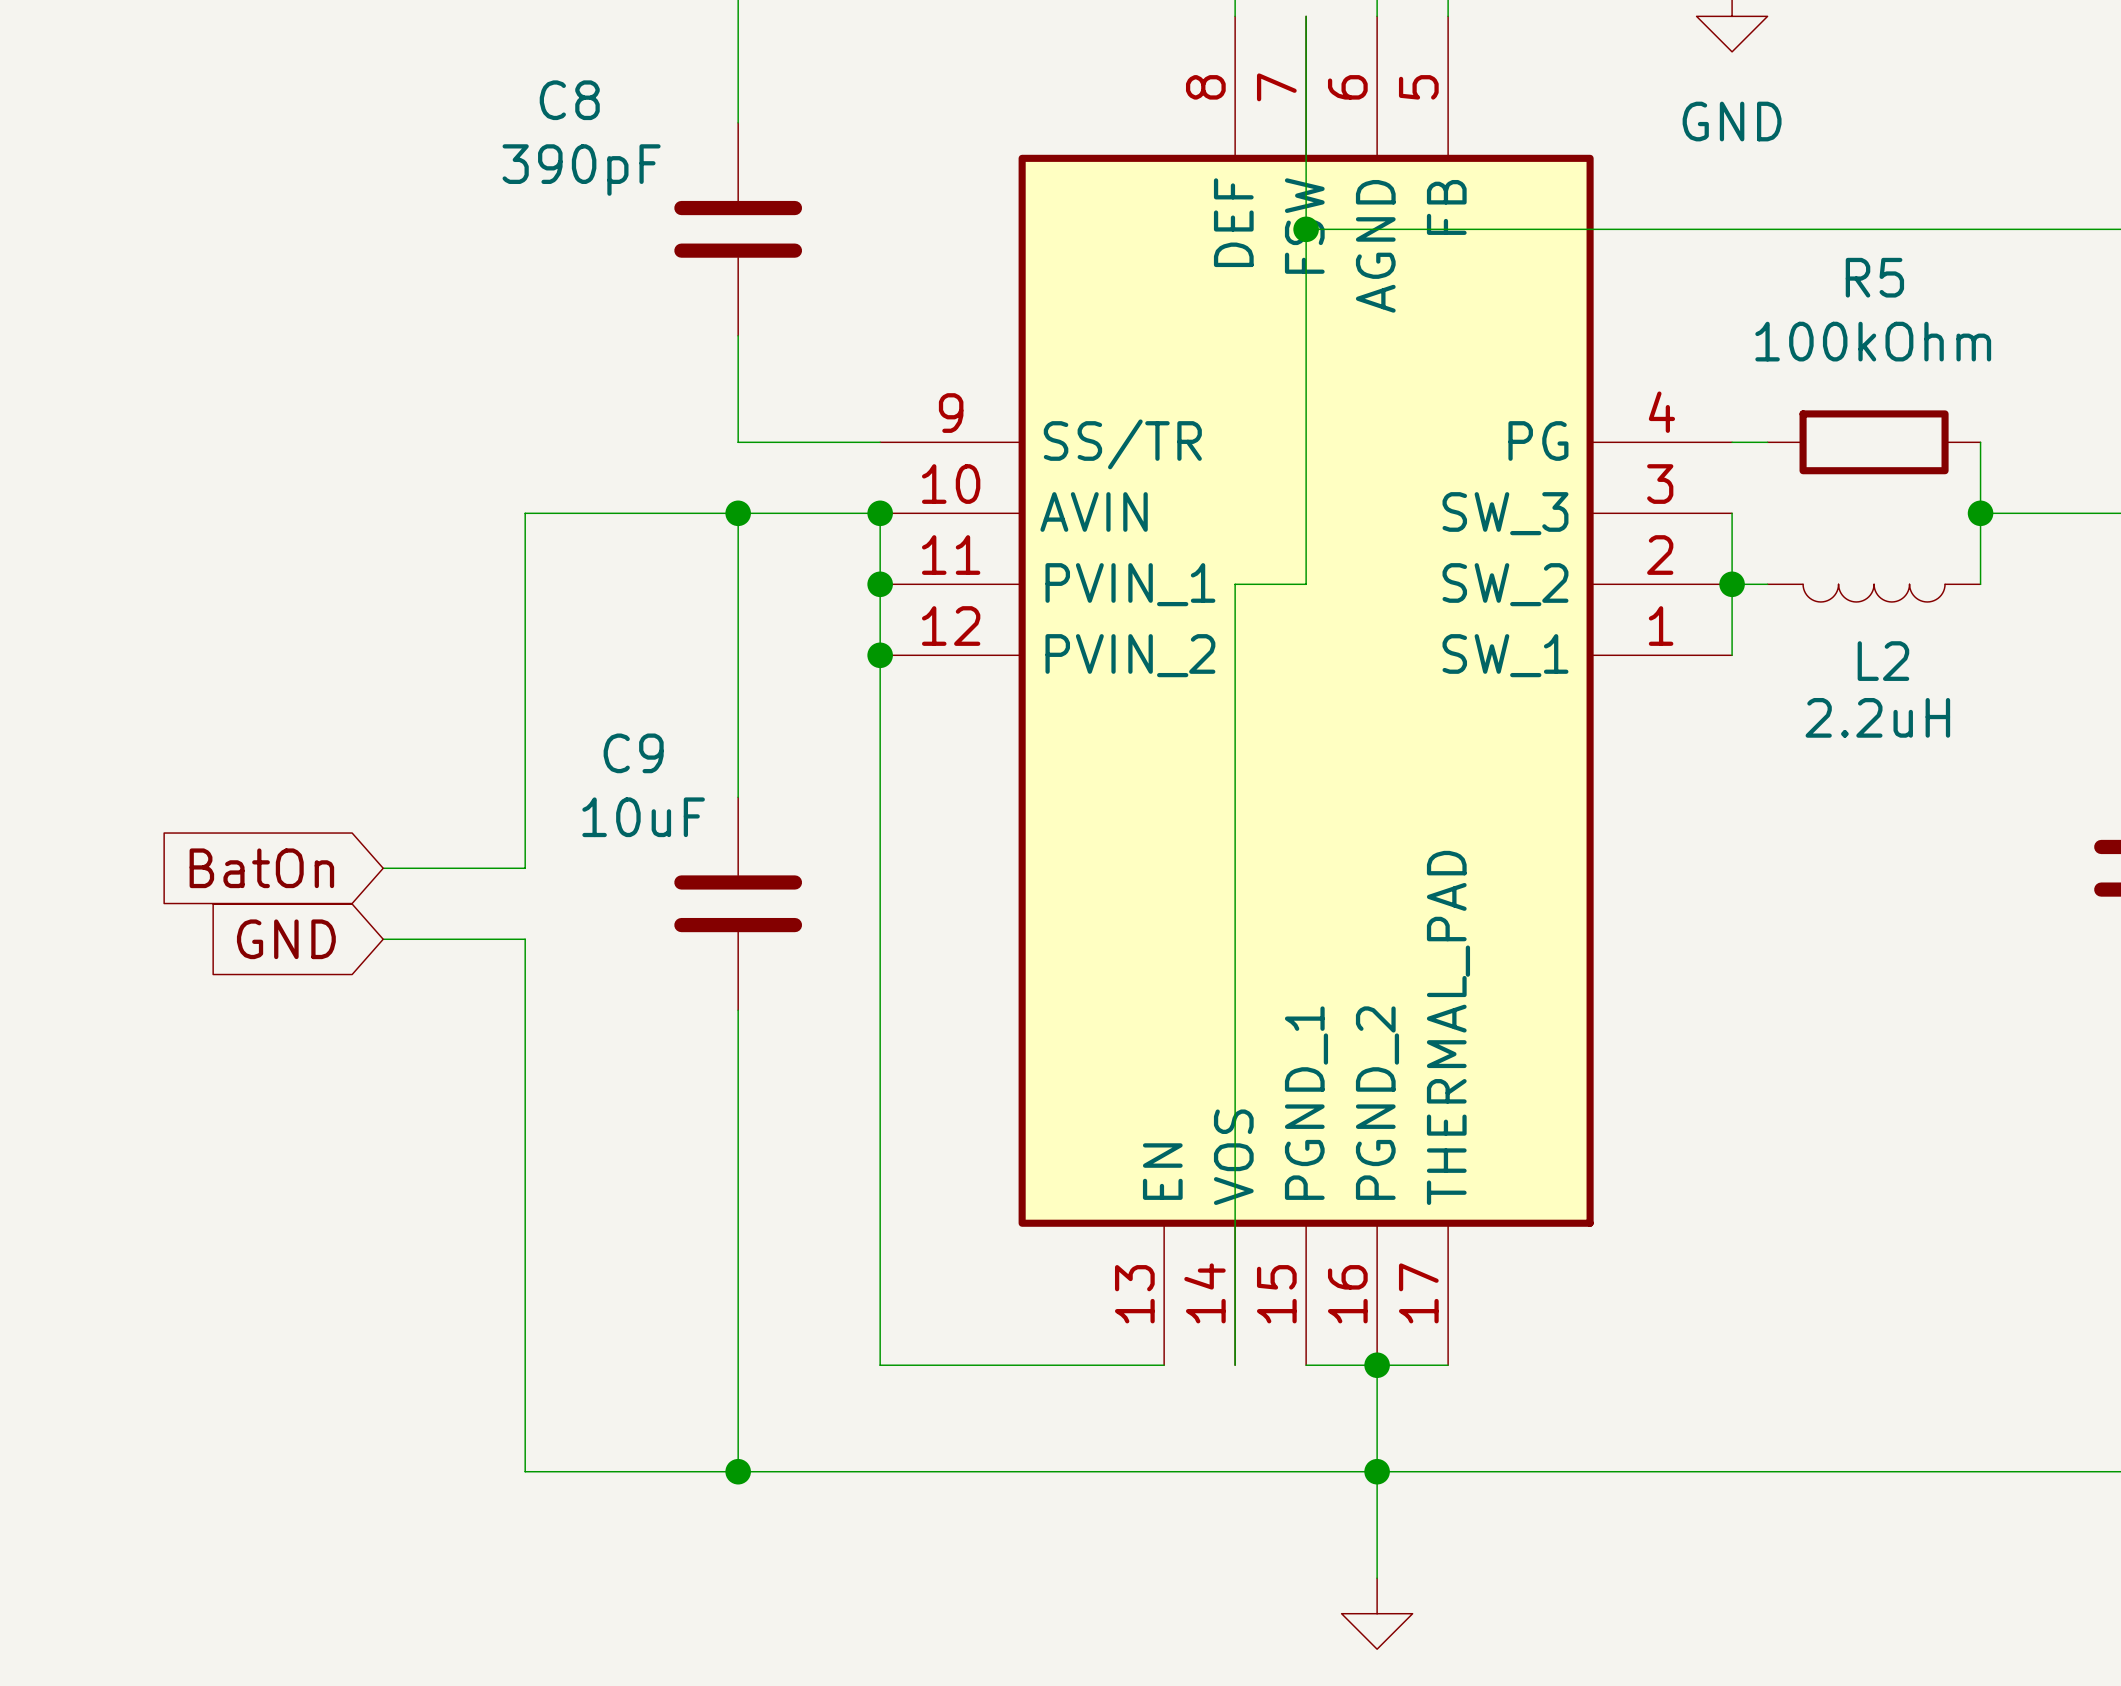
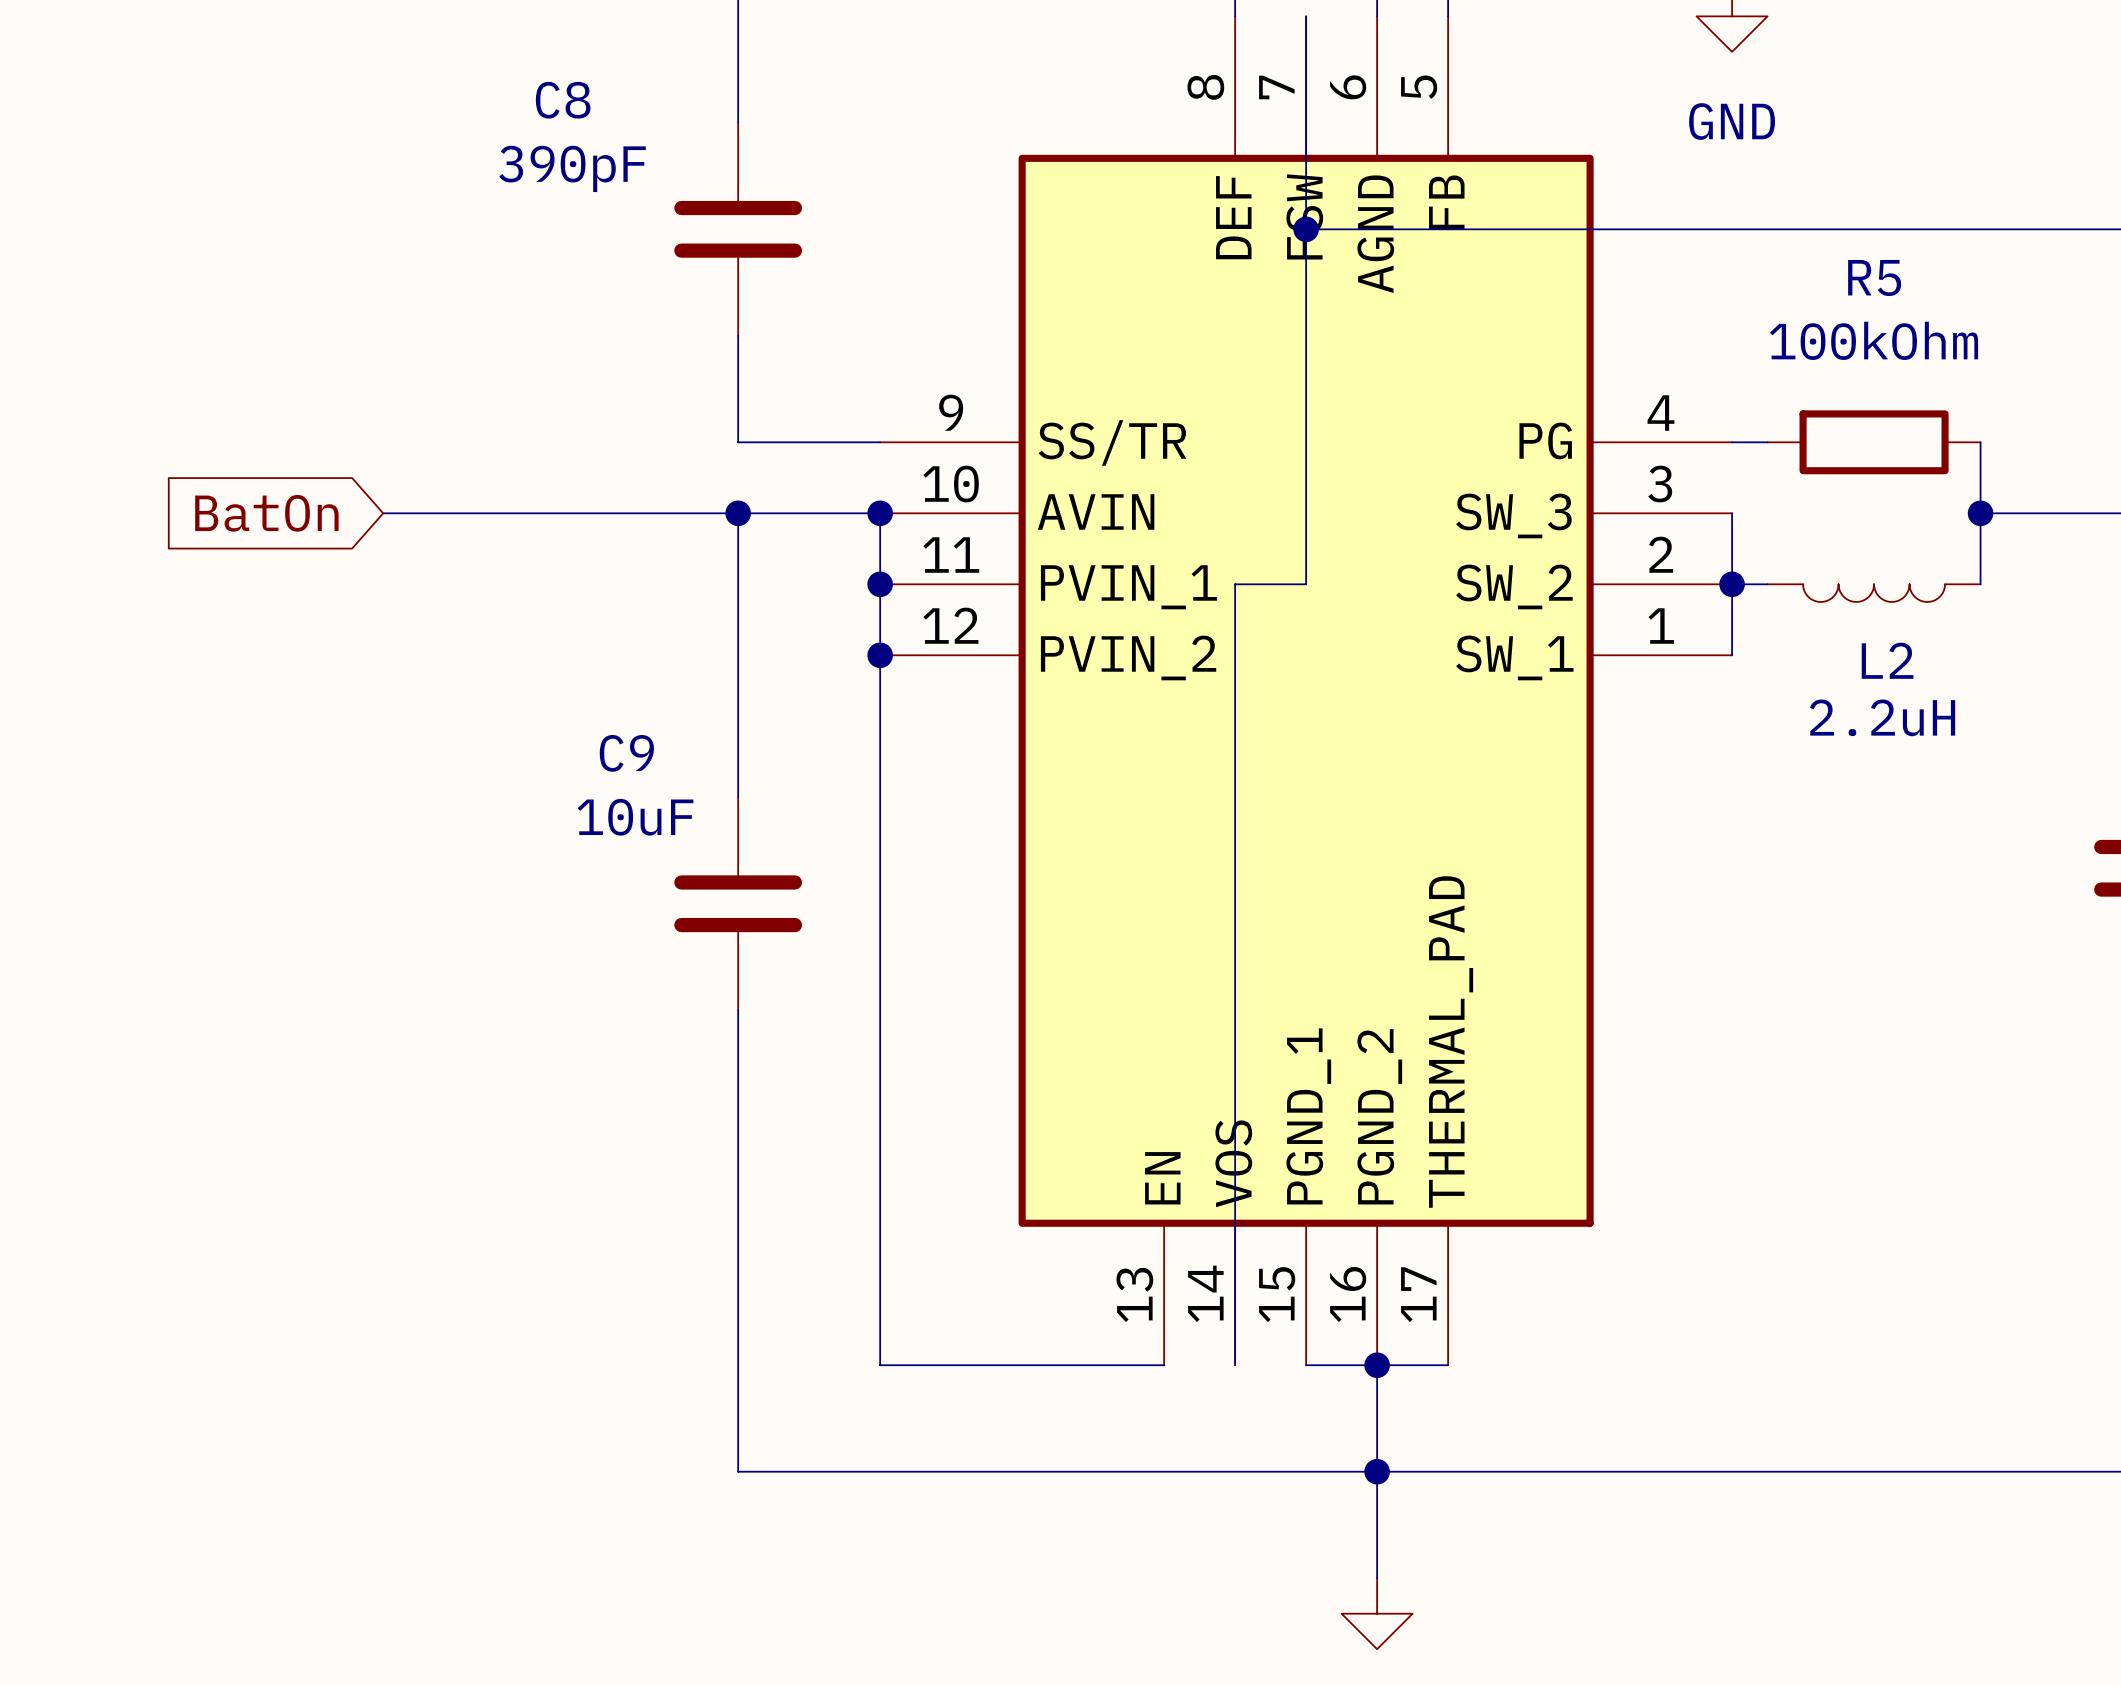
wire: (525, 513) (525, 868) (383, 868) -> (525, 513) (383, 513)
global label position: BatOn (261, 868) -> BatOn (266, 513)
global label: GND (286, 939) -> none
wire: (383, 939) (525, 939) (525, 1471) (738, 1471) -> none
junction: (738, 1471) -> none

